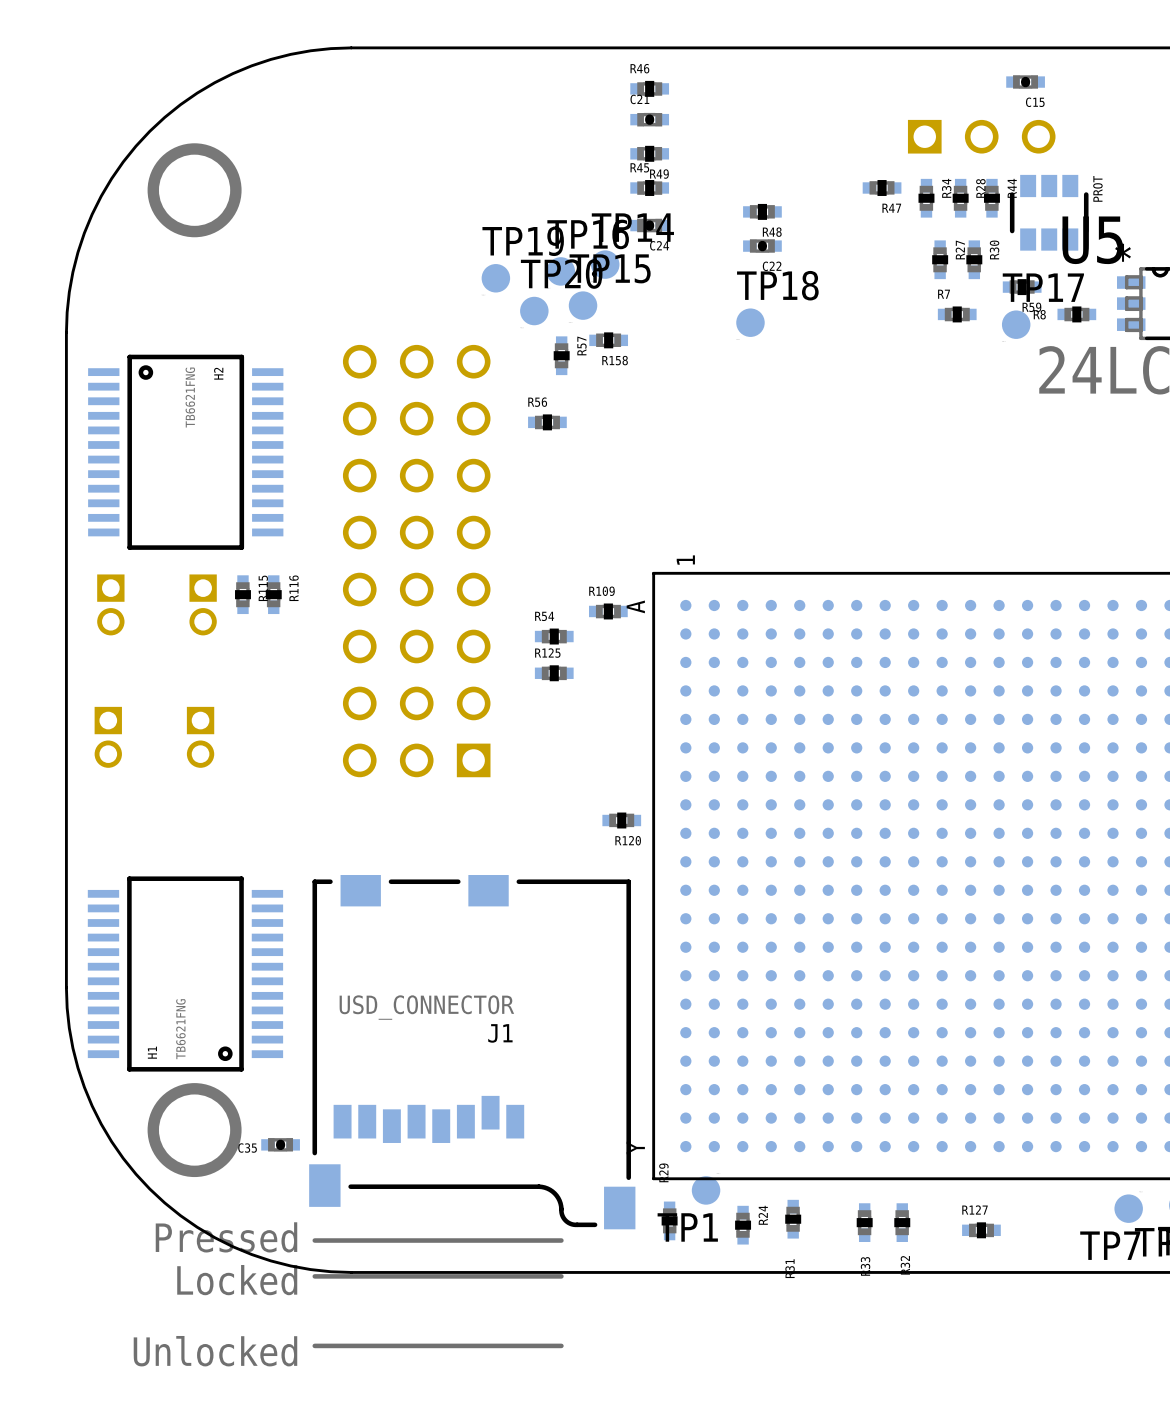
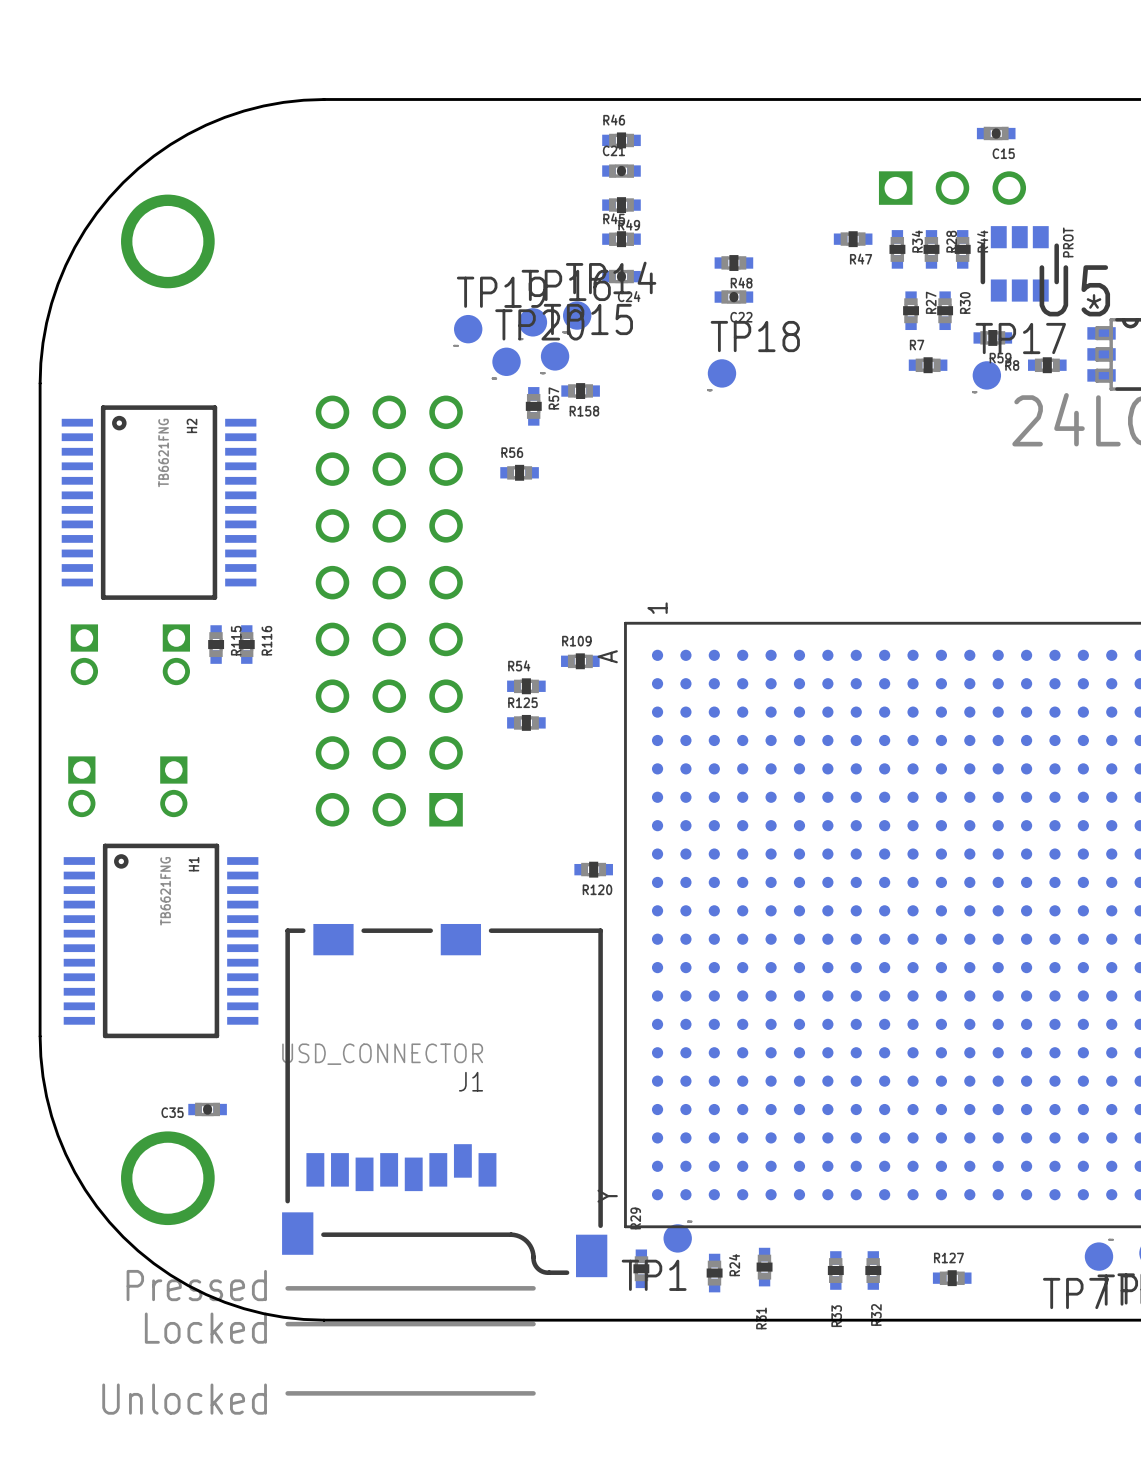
H1 rotation: 0° (185, 974) -> 180° (161, 940)
C35 position: (280, 1144) -> (207, 1109)

